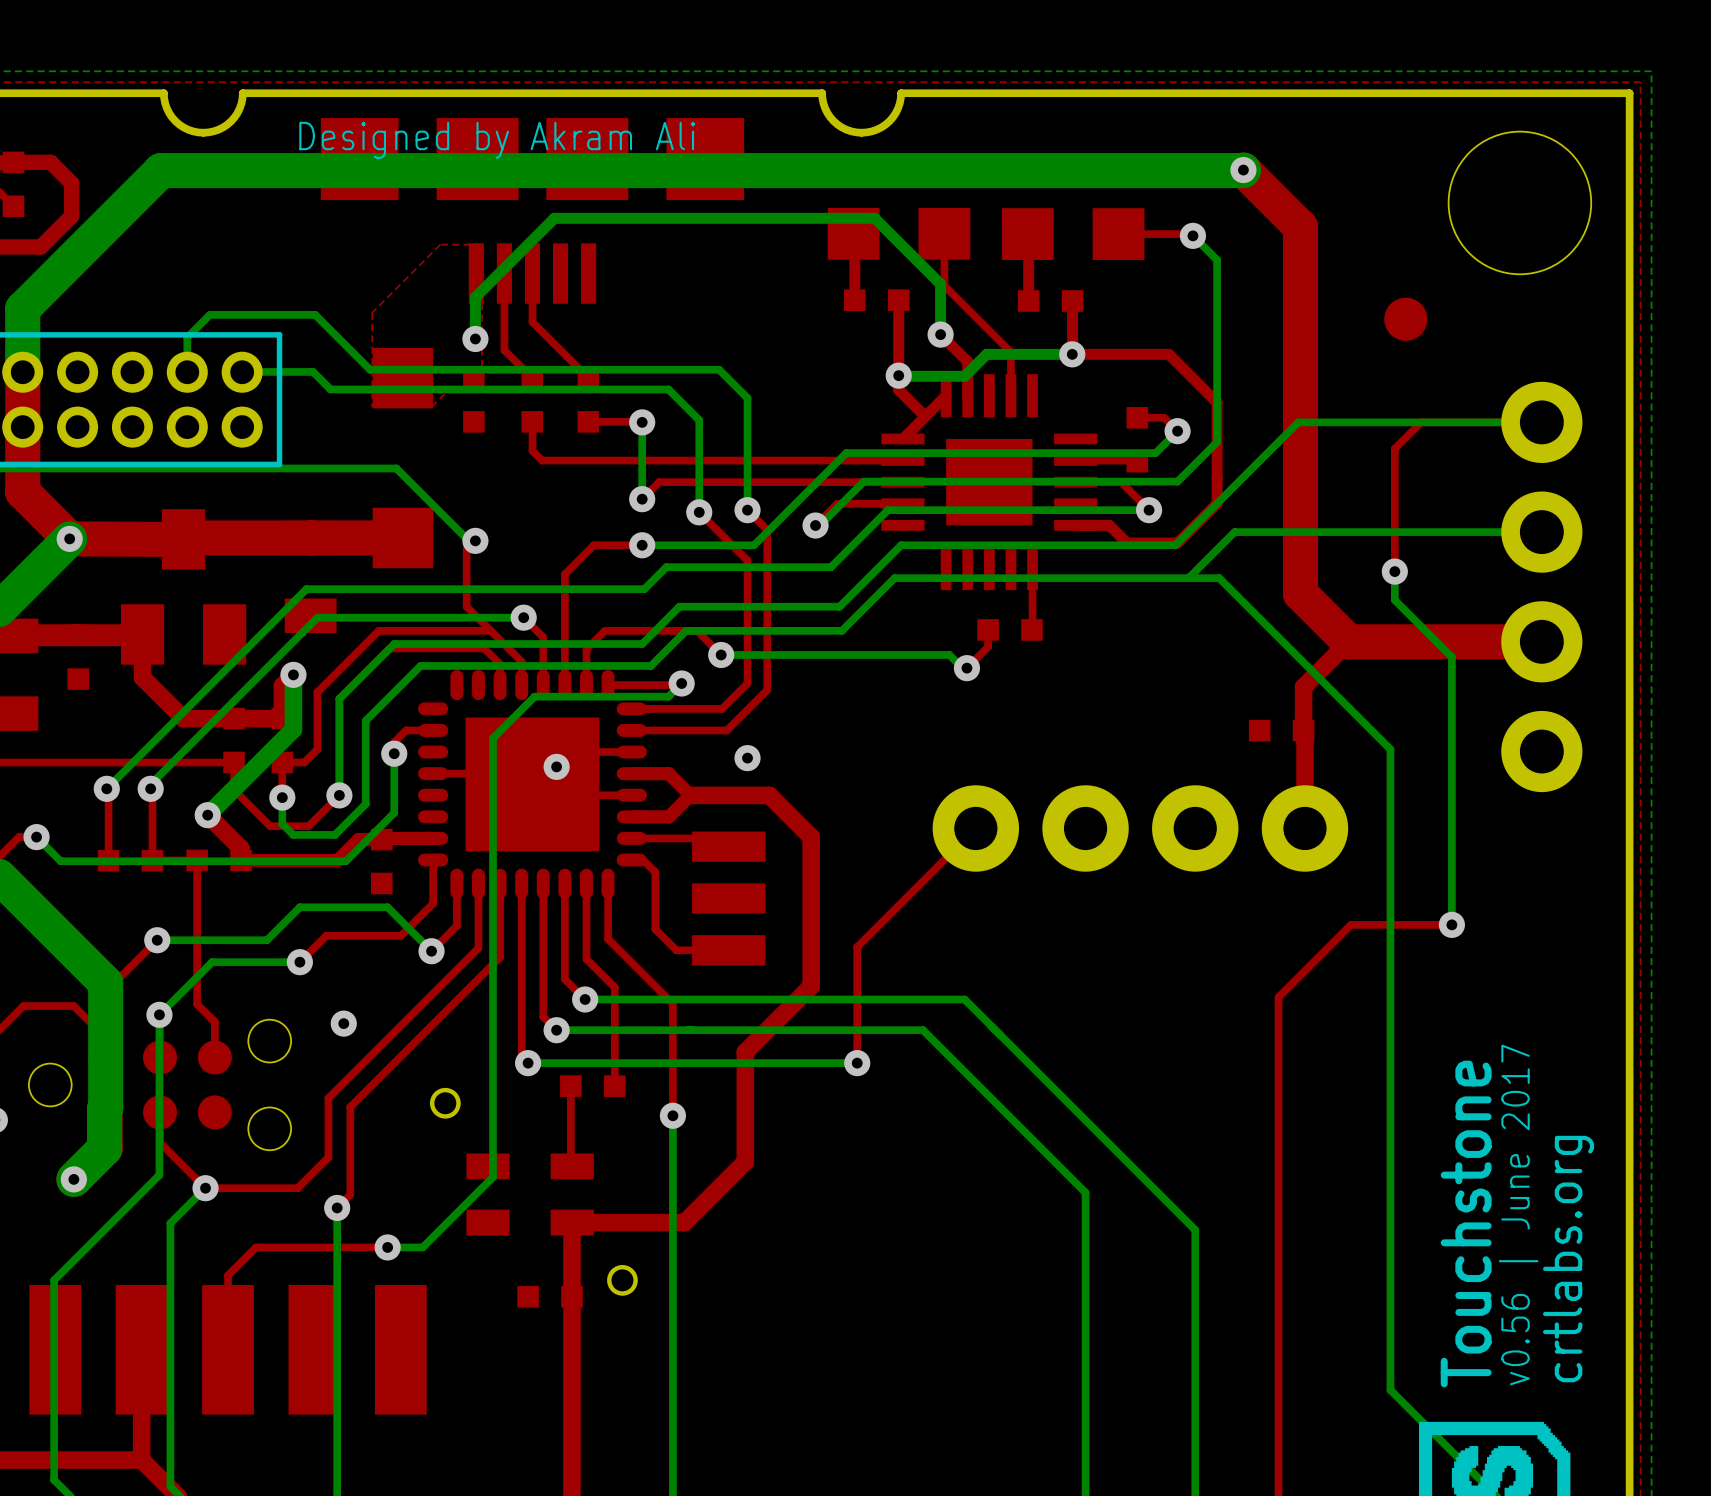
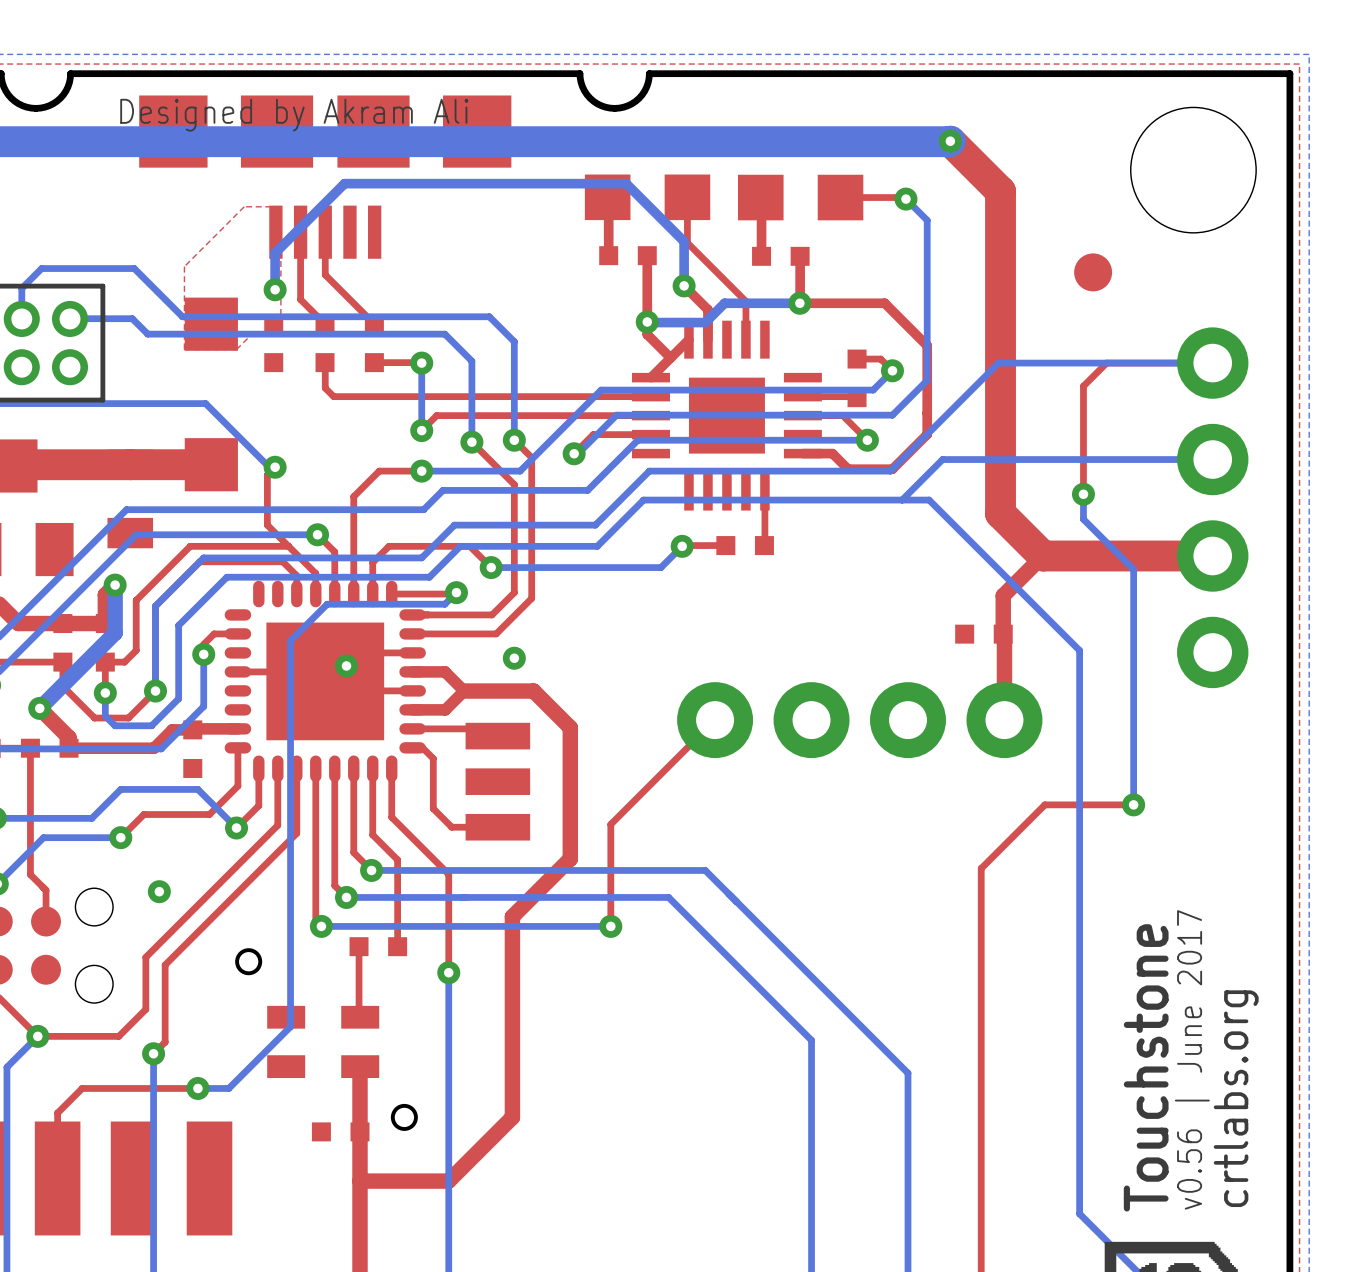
top track: (988, 629) (988, 646) (966, 668) -> (725, 545) (682, 546)
bottom track: (914, 654) (949, 654) (964, 670) (966, 668) -> (660, 567) (682, 546)
via position: (966, 668) -> (682, 546)
top track: (745, 1161) (684, 1222) (572, 1222) -> (512, 1013) (512, 1117) (448, 1181) (360, 1181)

